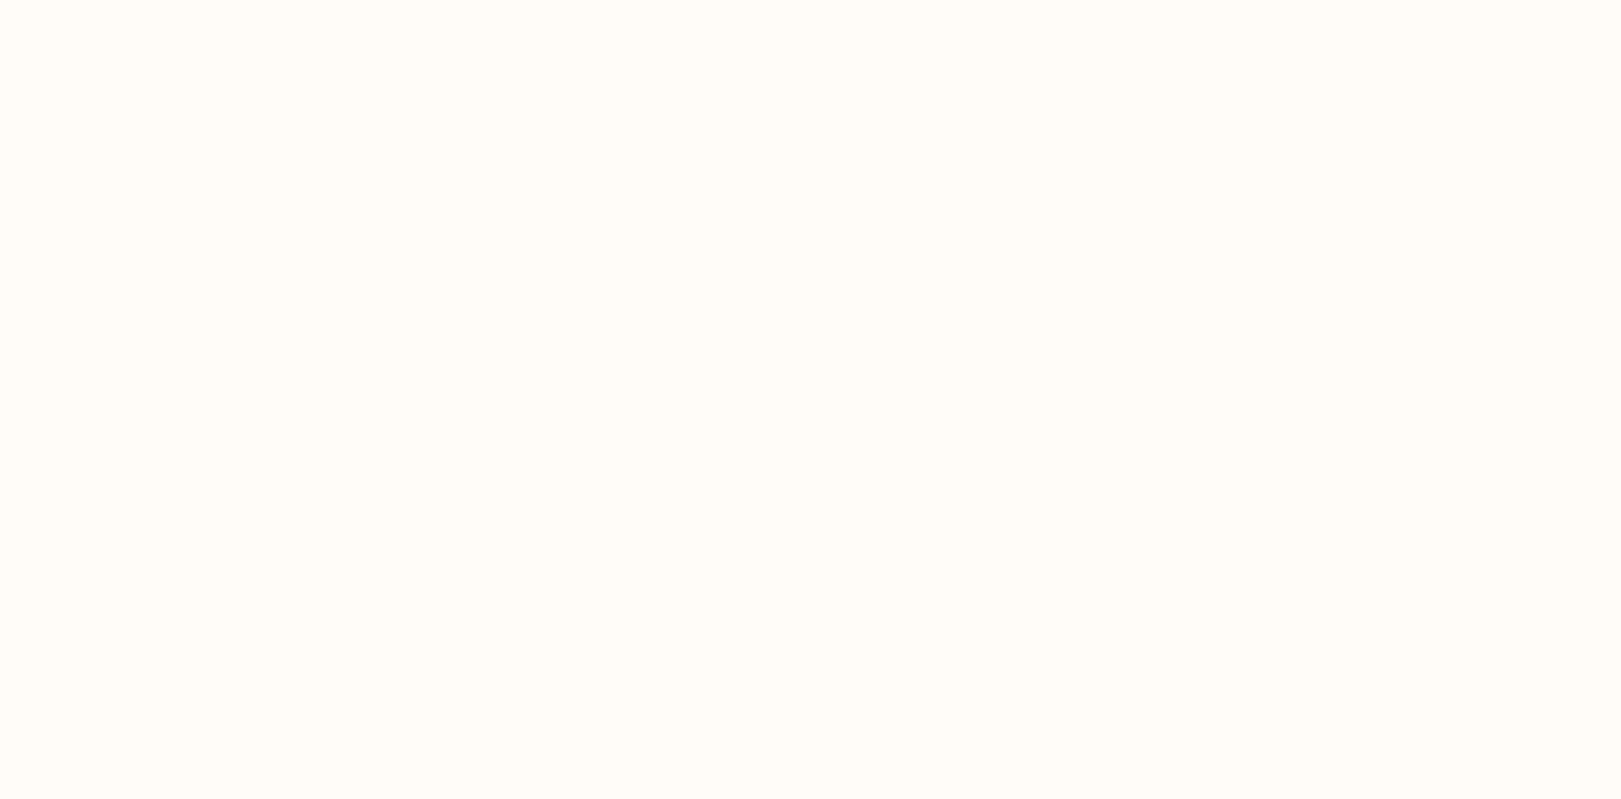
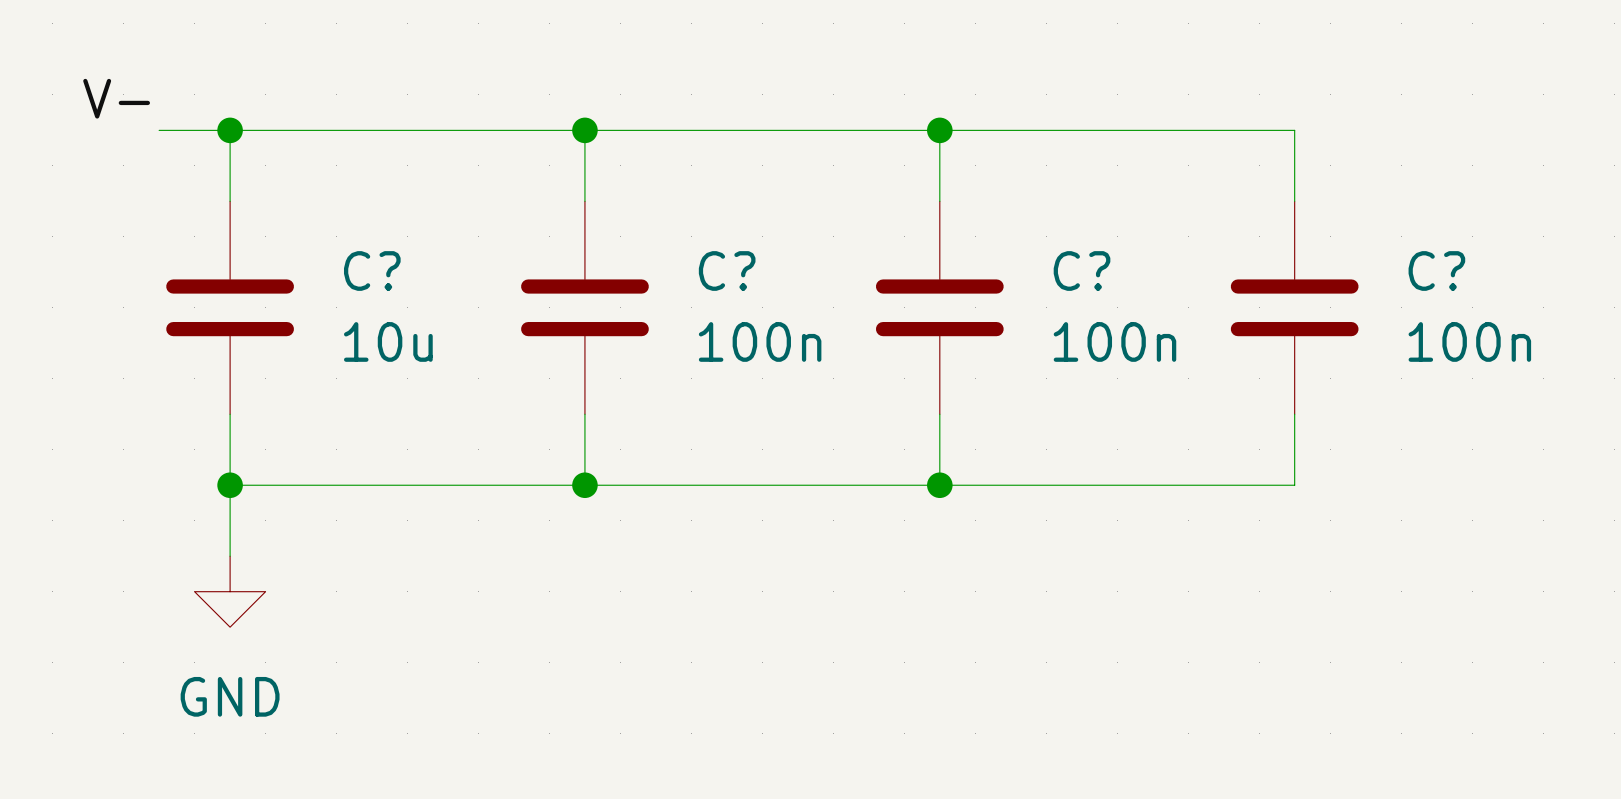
label: none -> V- (116, 98)
wire: none -> (159, 130) (1294, 130) (1294, 201)
wire: none -> (230, 130) (230, 201)
junction: none -> (230, 130)
wire: none -> (584, 130) (584, 201)
junction: none -> (584, 130)
wire: none -> (939, 130) (939, 201)
junction: none -> (939, 130)
C?: none -> 10u (230, 307)
C?: none -> 100n (584, 307)
C?: none -> 100n (939, 307)
C?: none -> 100n (1294, 307)
wire: none -> (230, 414) (230, 556)
wire: none -> (584, 414) (584, 485)
wire: none -> (939, 414) (939, 485)
wire: none -> (1294, 414) (1294, 485) (230, 485)
junction: none -> (230, 485)
junction: none -> (584, 485)
junction: none -> (939, 485)
power symbol: none -> GND (230, 591)

